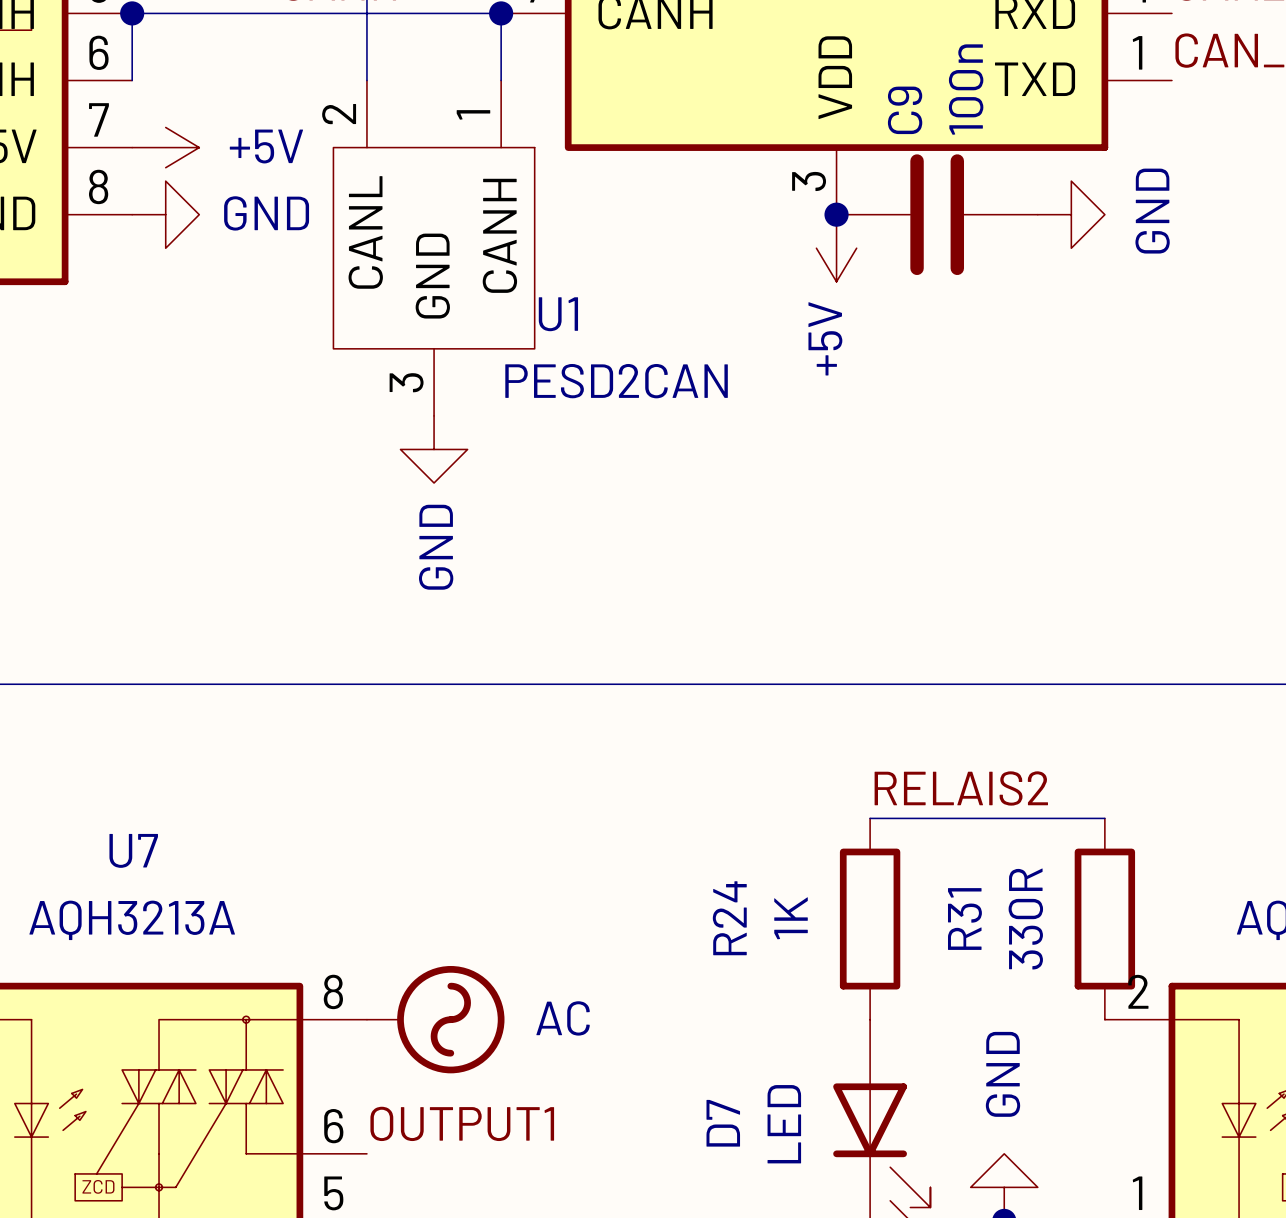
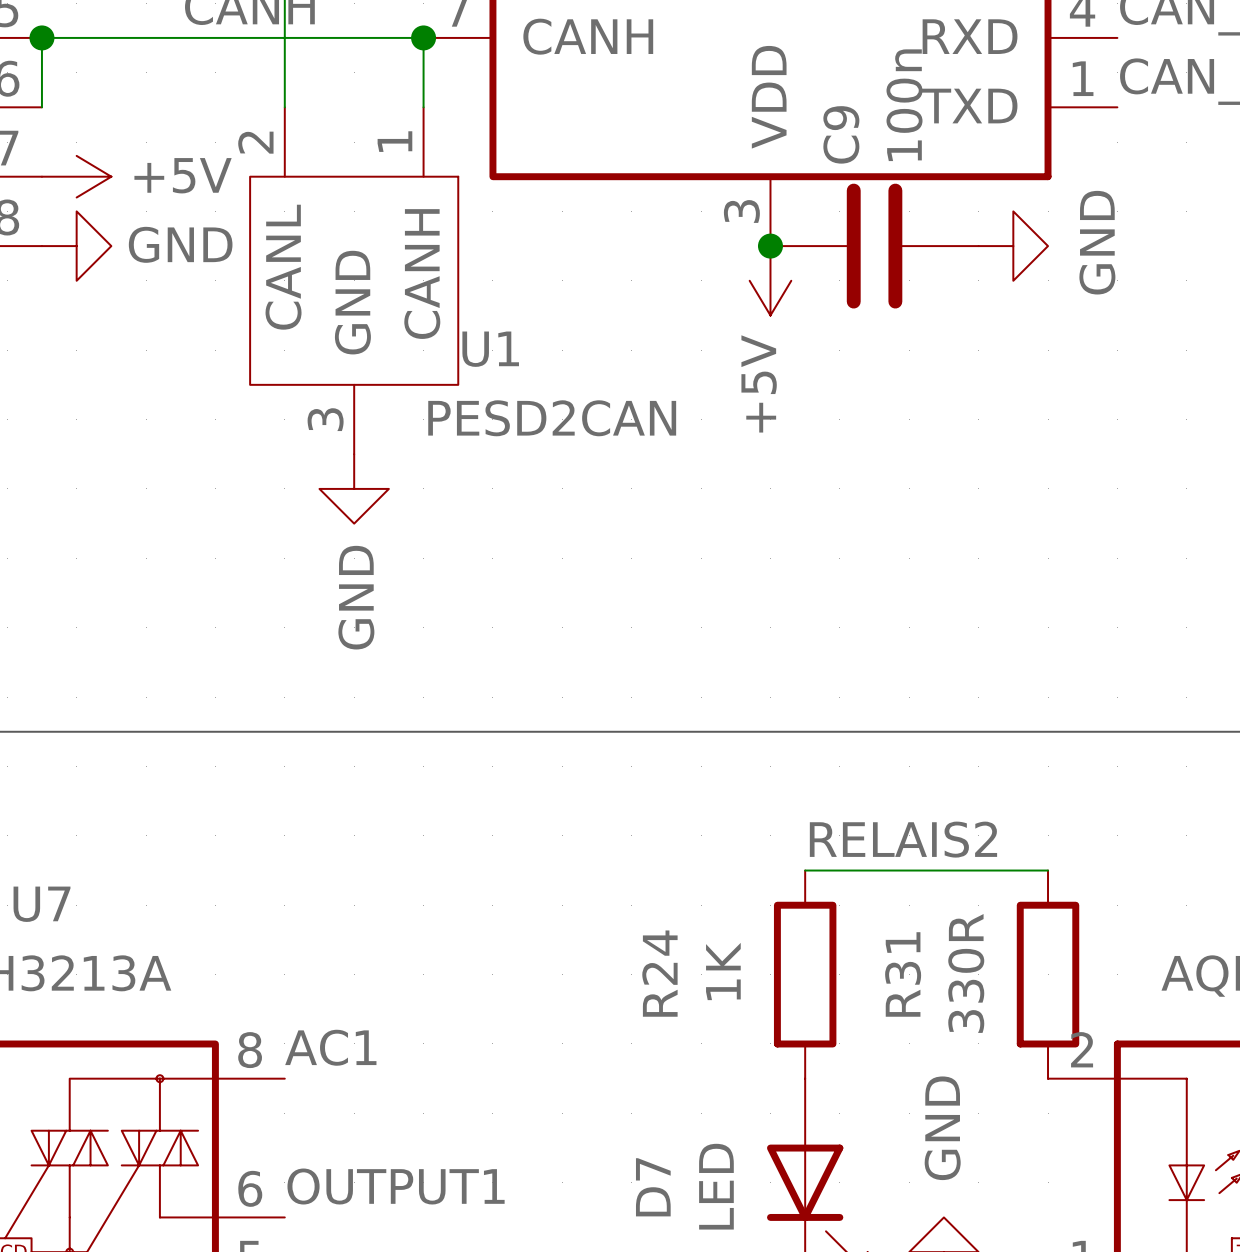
label: none -> AC1 (330, 1047)
power symbol: AC (435, 1019) -> none

